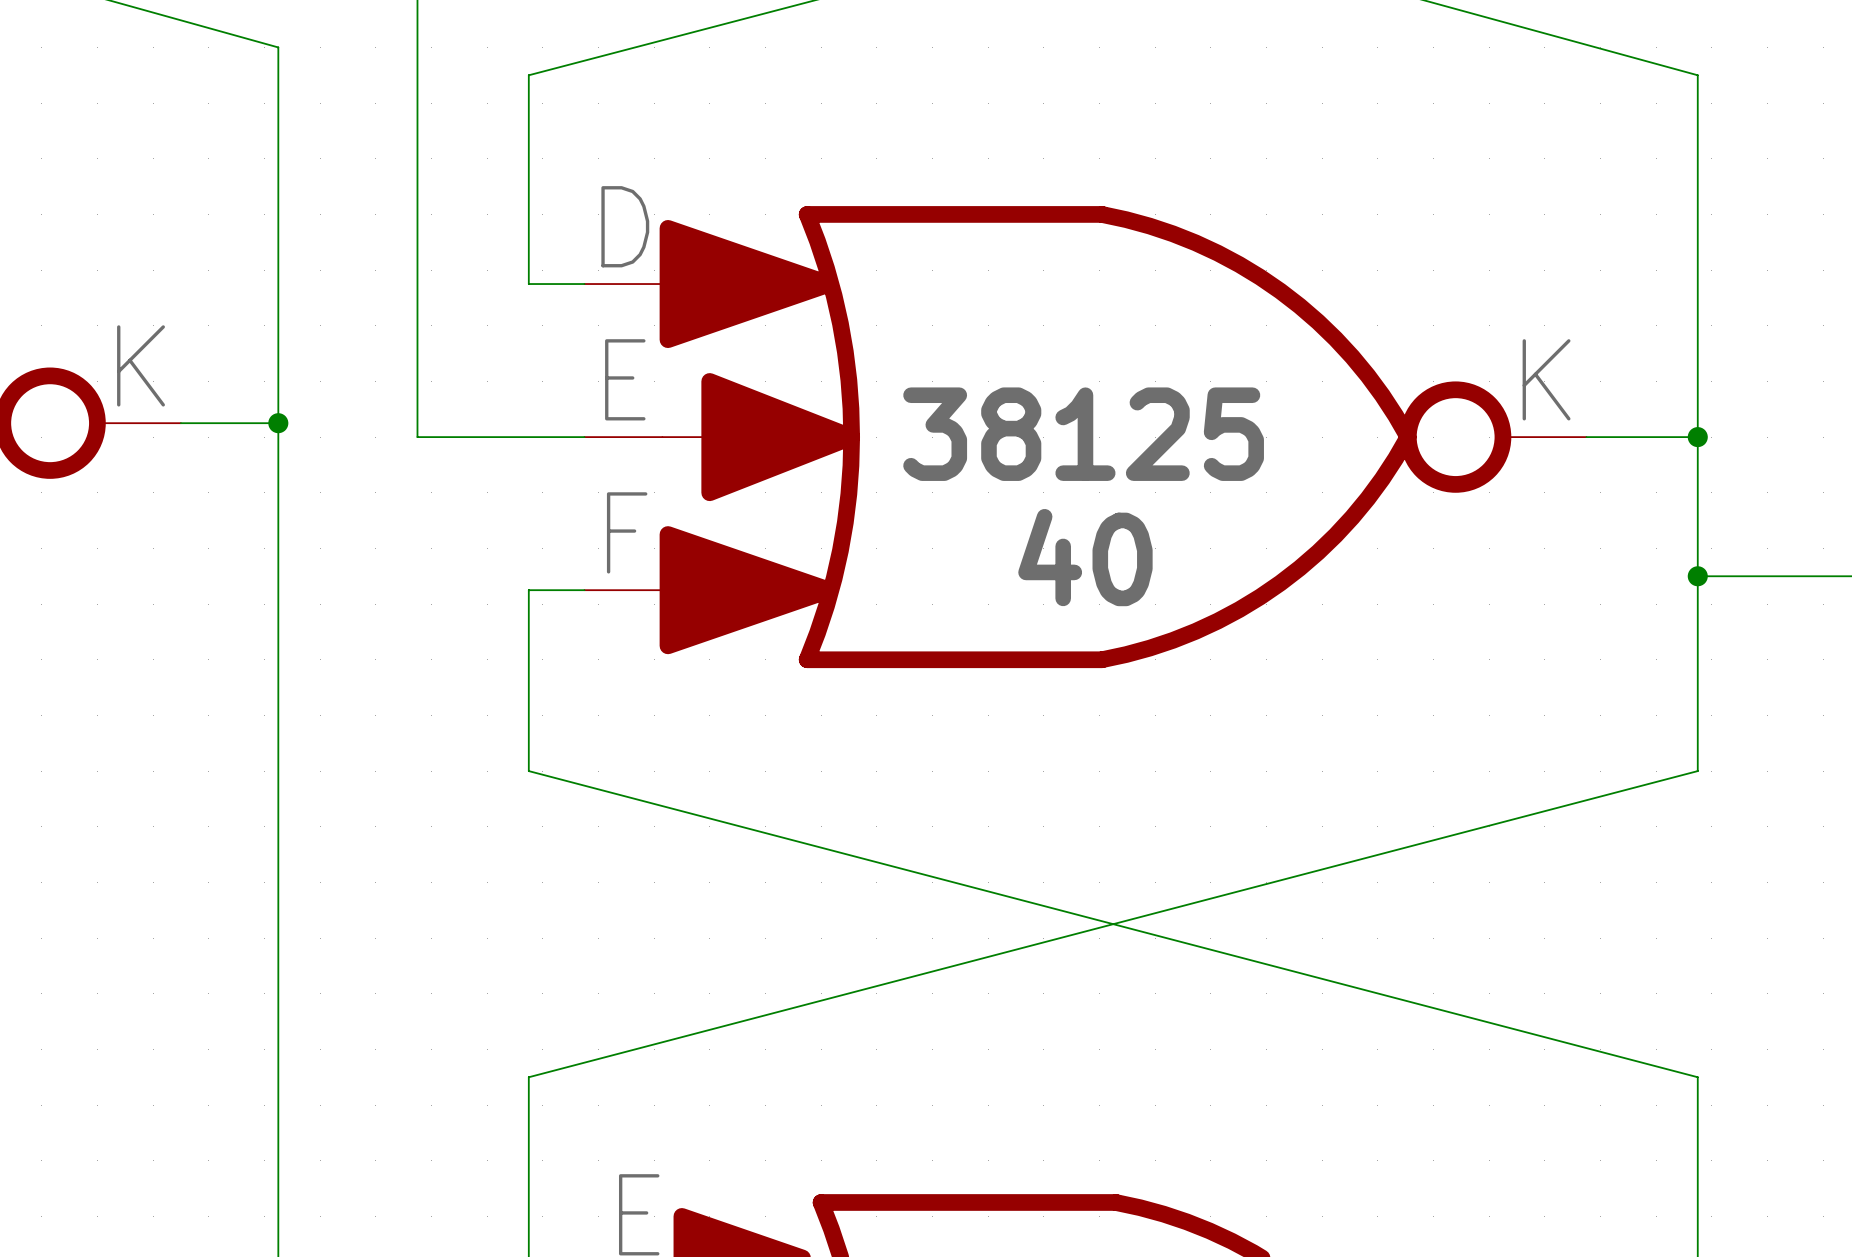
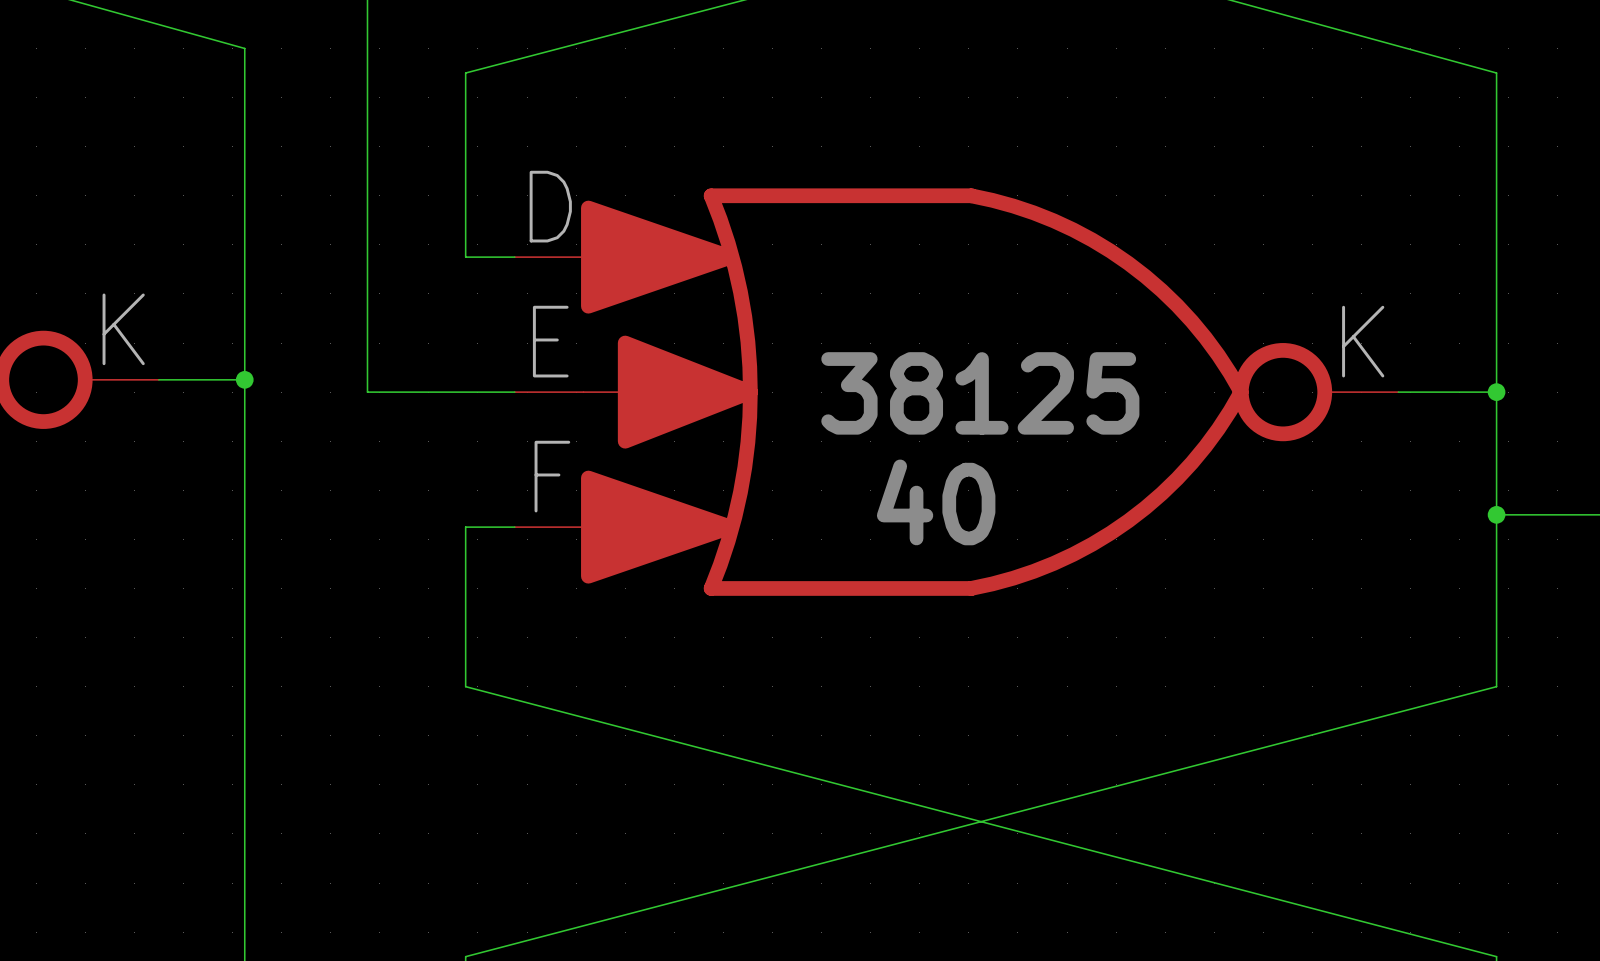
part text: 38125 (1083, 434) -> none
text: none -> 38125 (980, 393)
part text: 40 (1085, 557) -> none
text: none -> 40 (936, 502)

